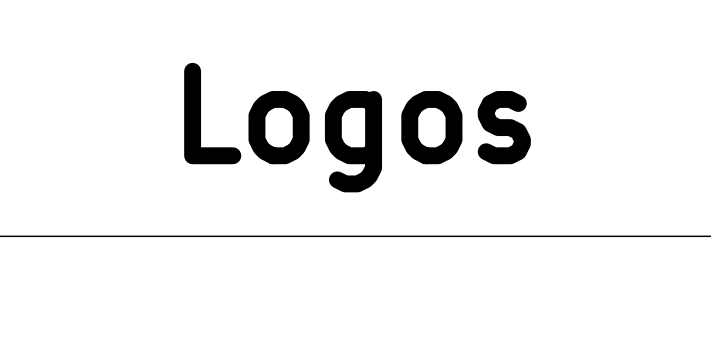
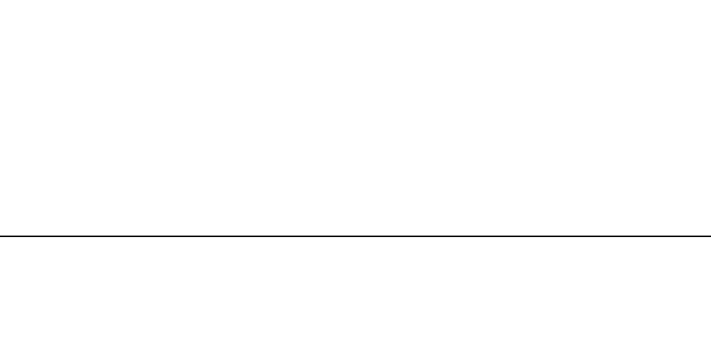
text: Logos (357, 127) -> none

